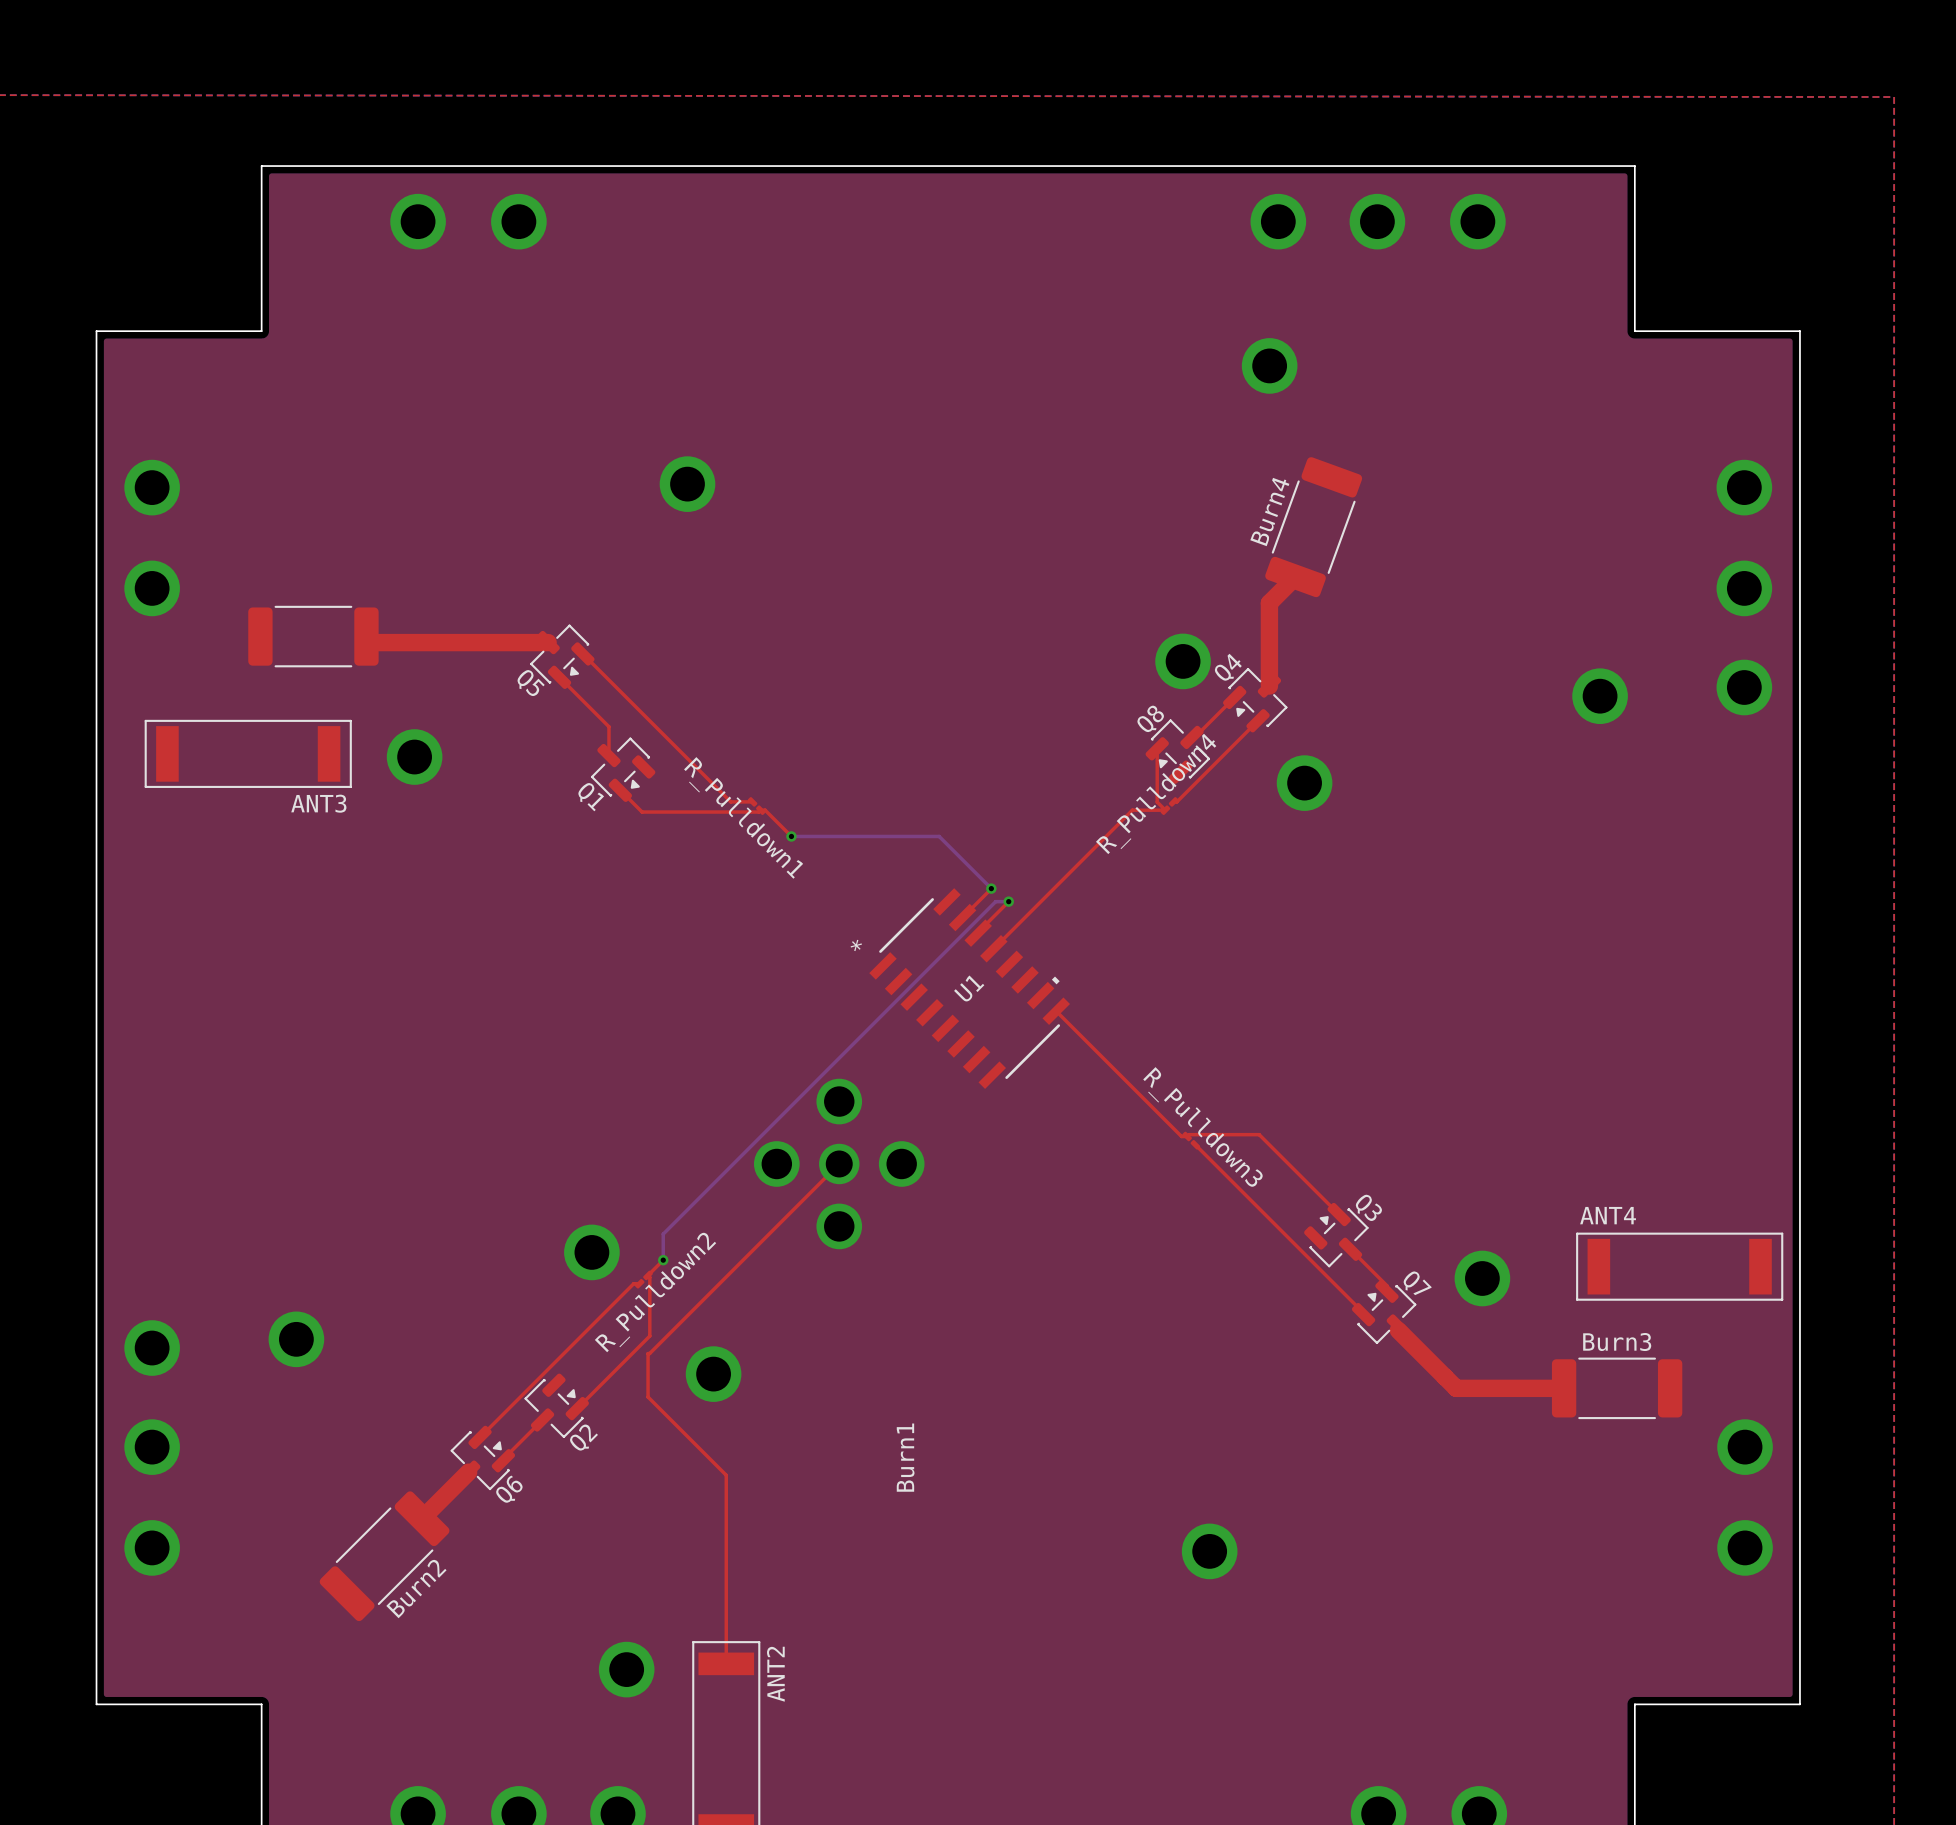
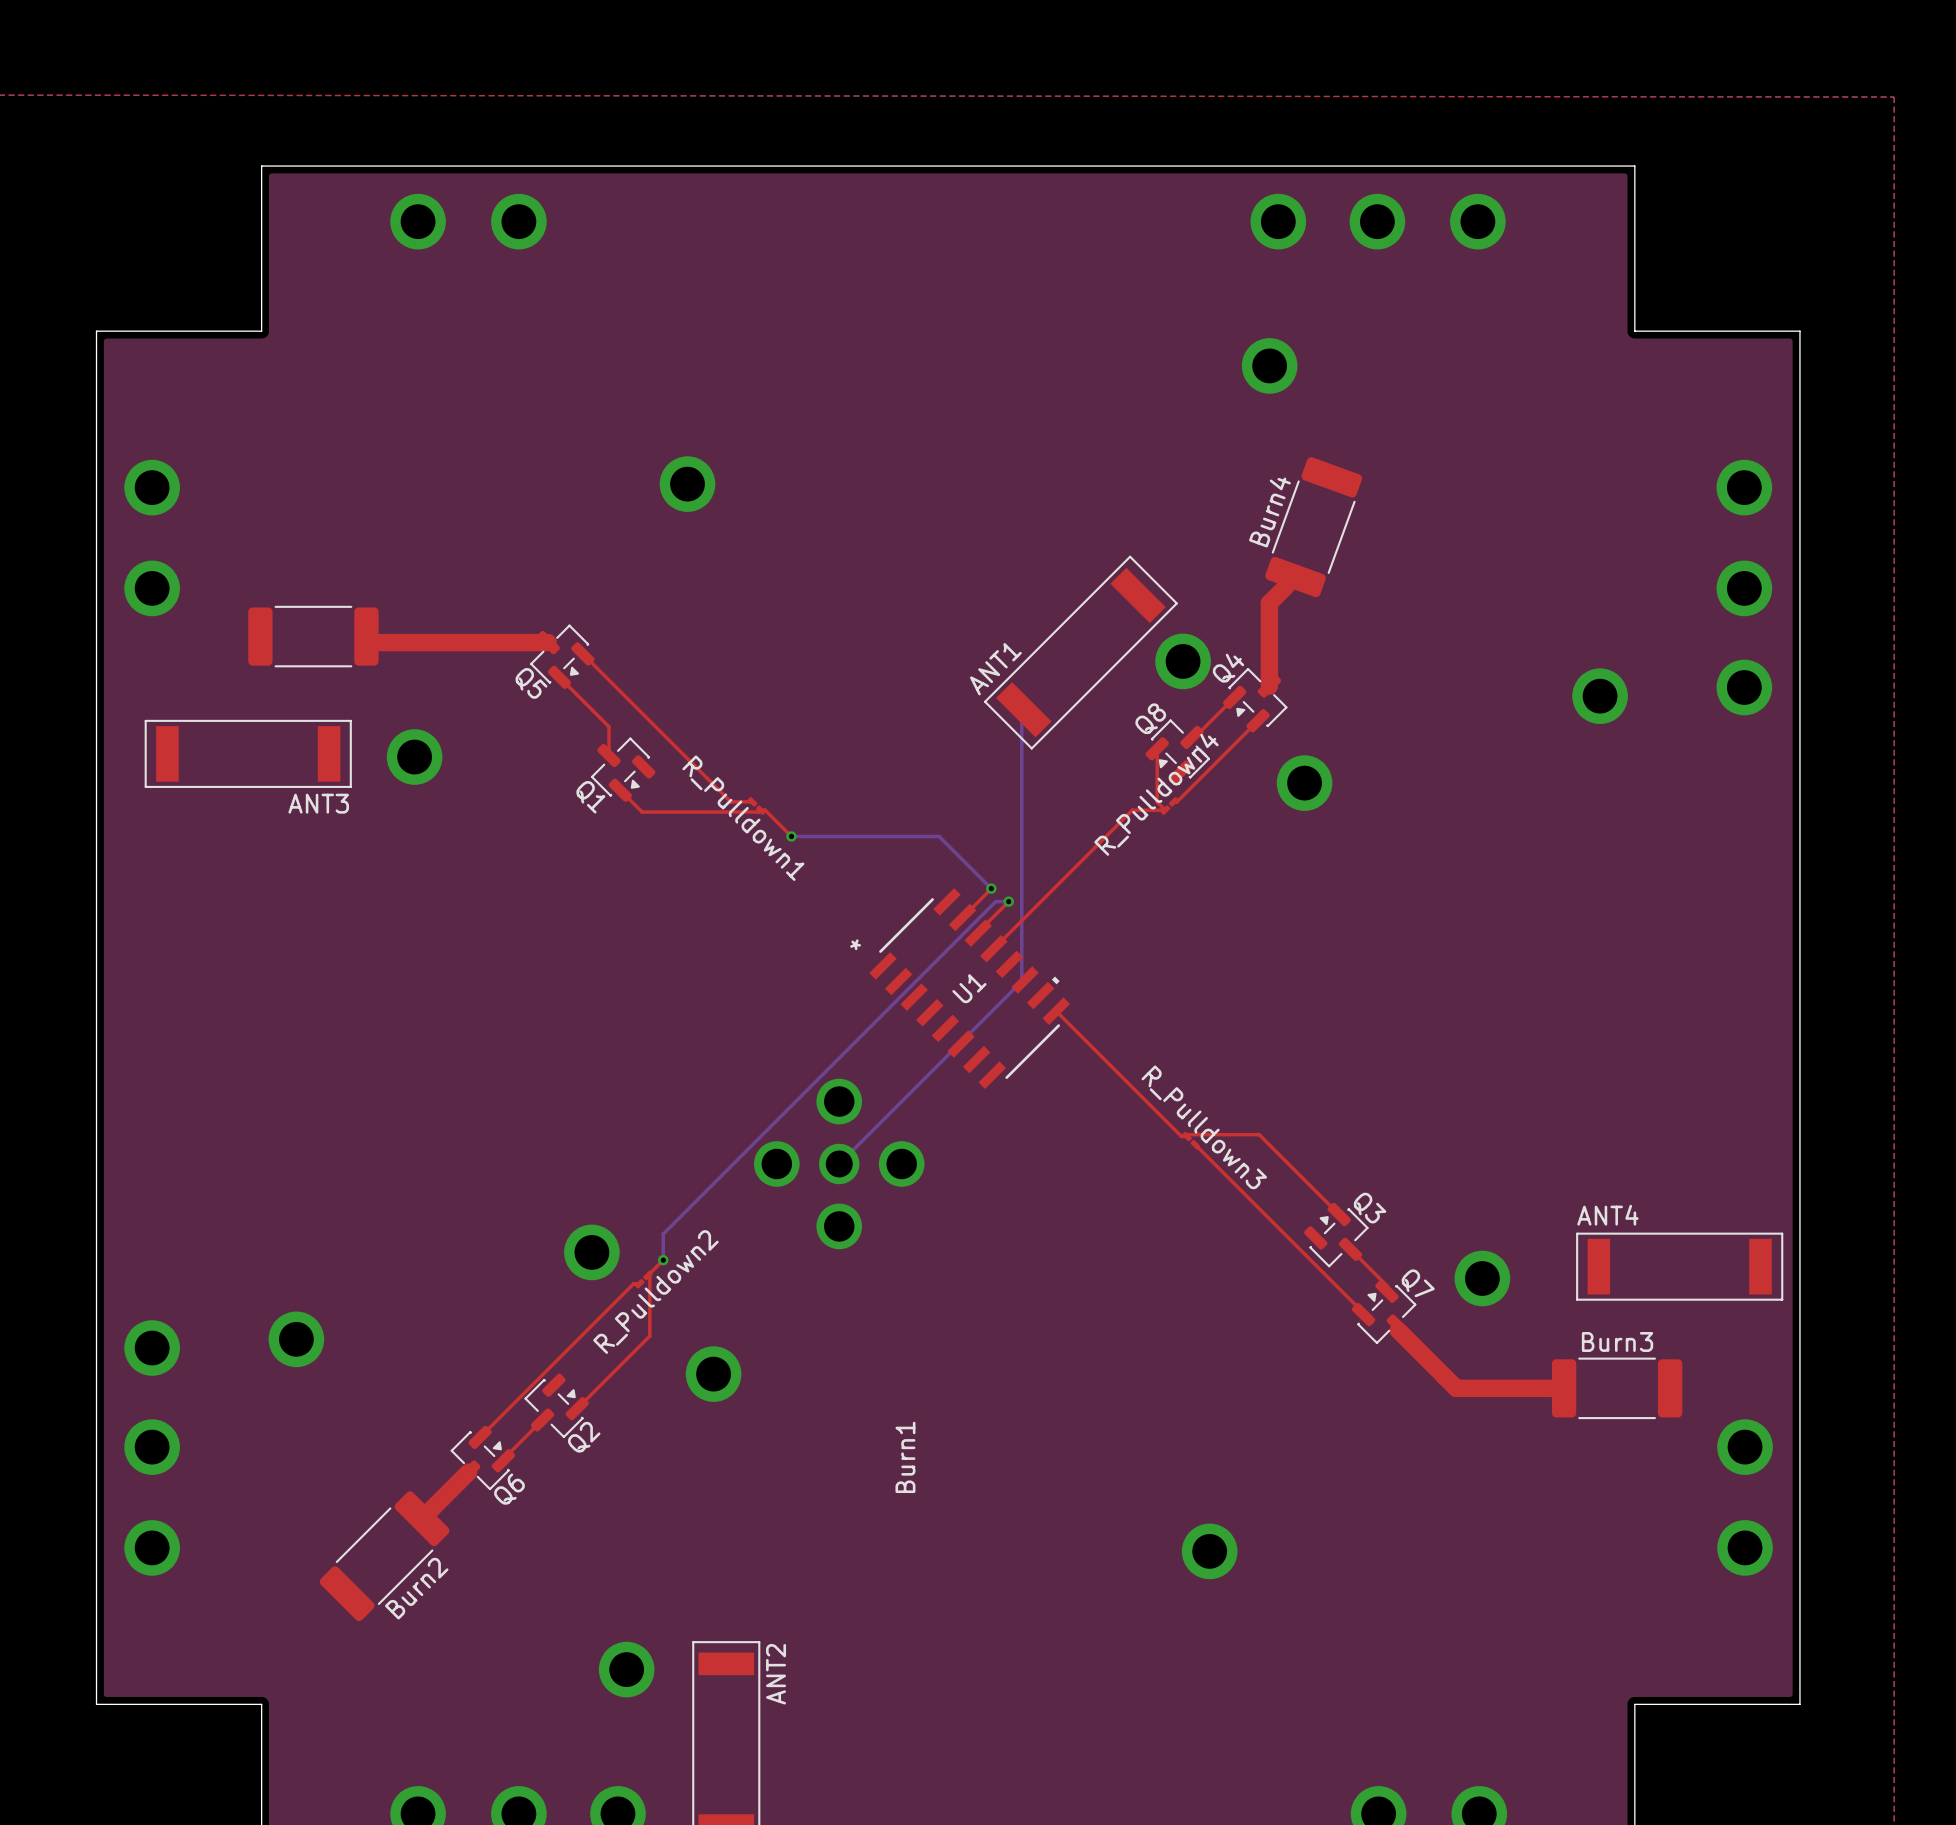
ANT1: none -> (1080, 652)
bottom track: none -> (1021, 706) (1021, 981) (839, 1163)
top track: (839, 1163) (648, 1353) (648, 1397) (726, 1475) (726, 1663) -> none

